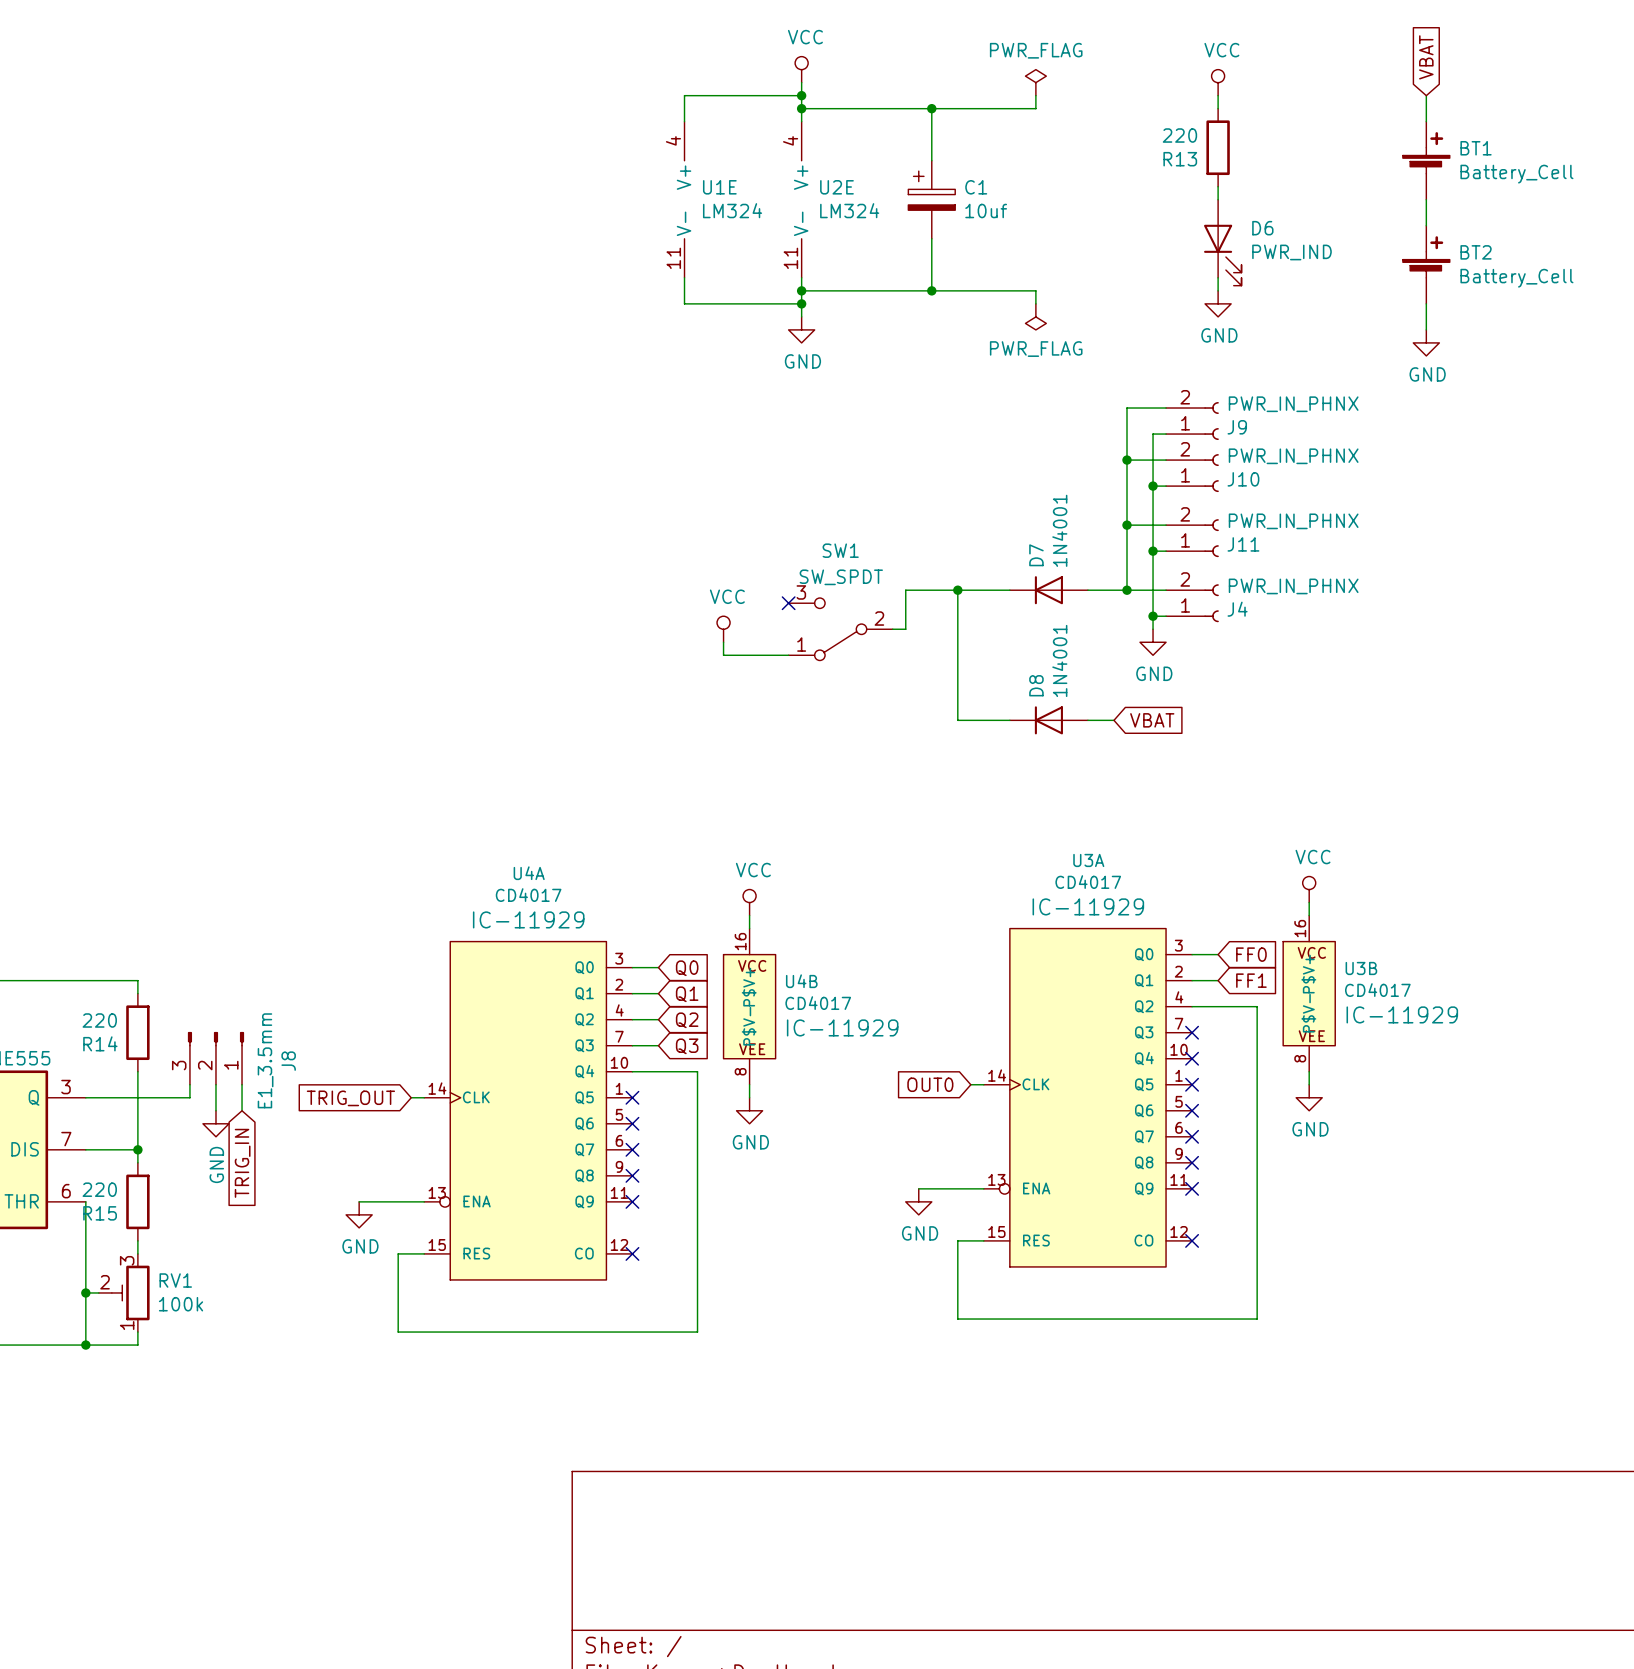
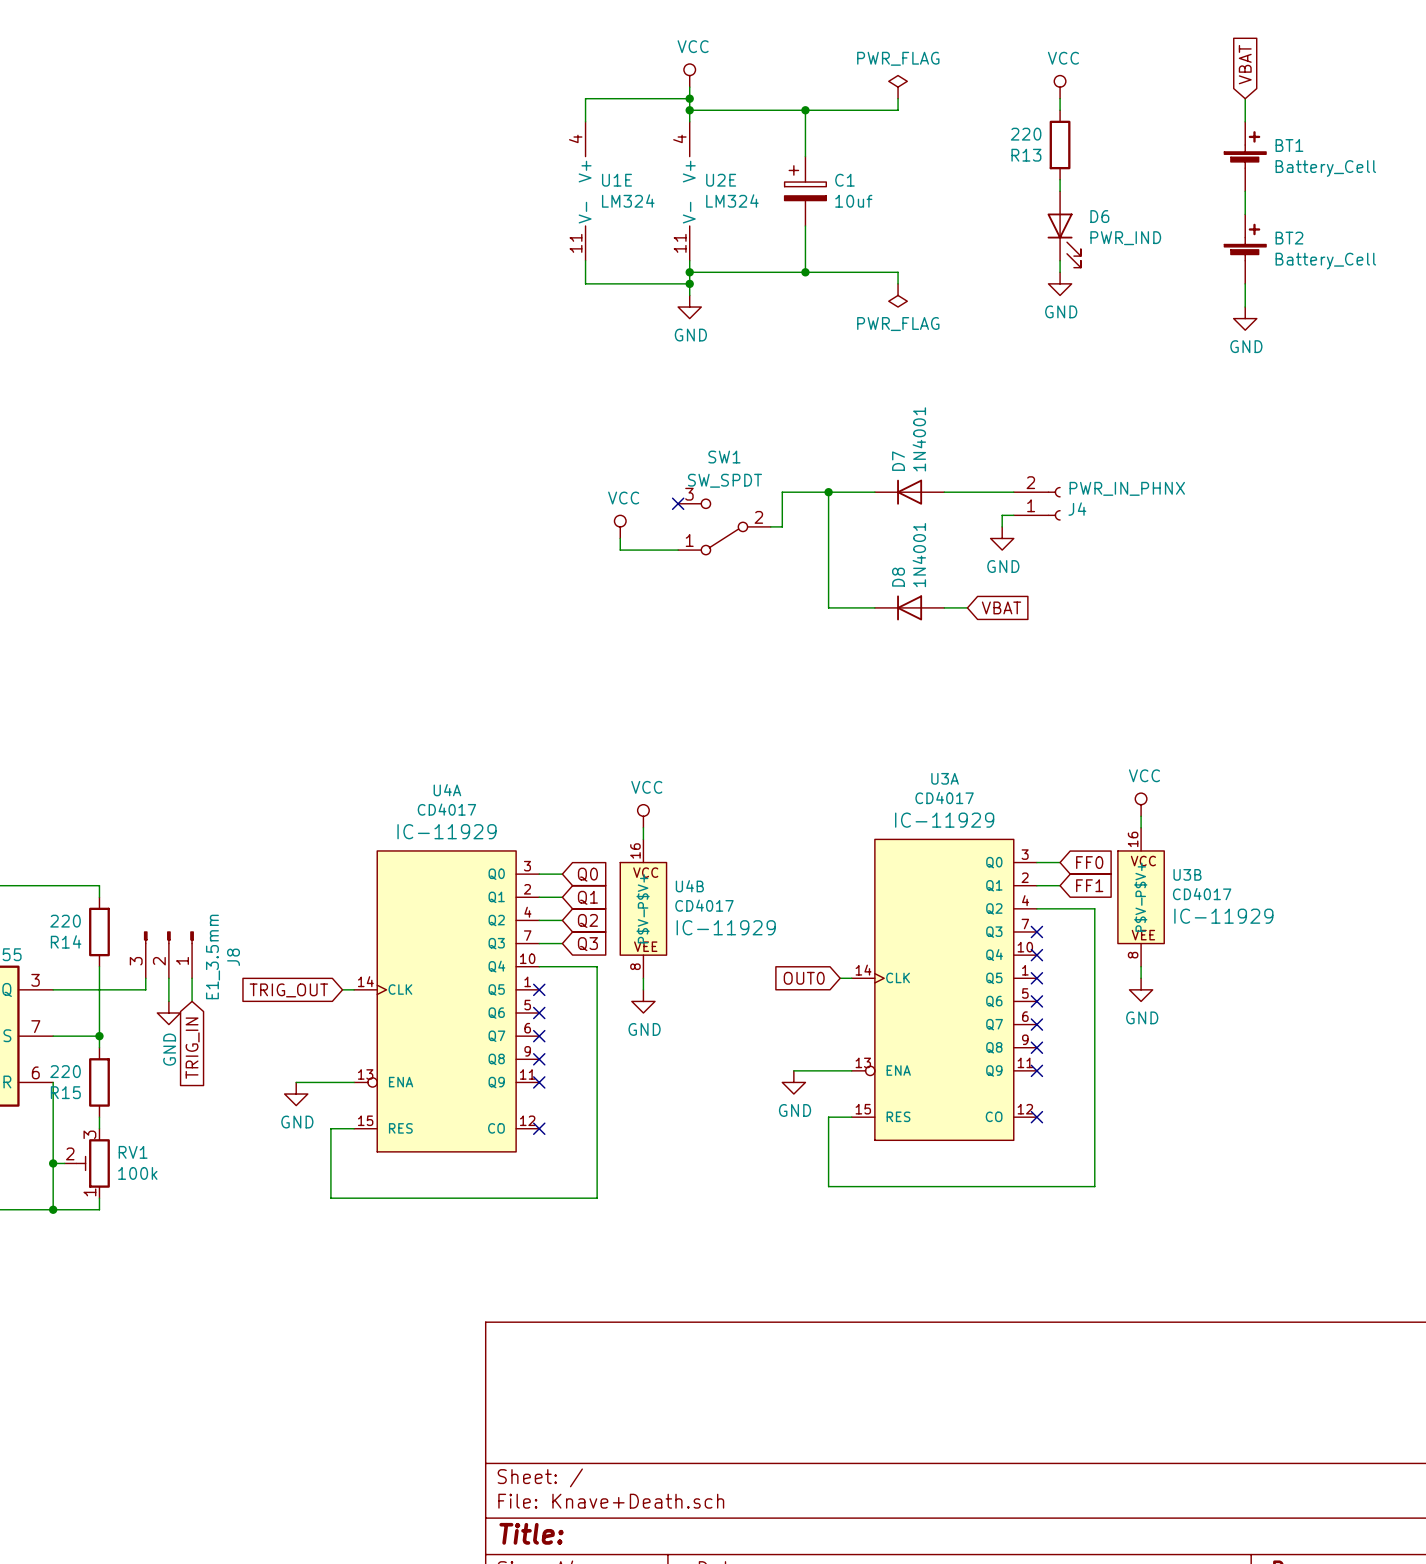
wire: (1166, 408) (1127, 408) (1127, 590) -> none
J9: PWR_IN_PHNX (1192, 421) -> none
wire: (1166, 434) (1153, 434) (1153, 564) -> (1013, 515) (1002, 515)
wire: (1127, 460) (1166, 460) -> none
junction: (1127, 460) -> none
J10: PWR_IN_PHNX (1192, 473) -> none
wire: (1153, 486) (1166, 486) -> none
junction: (1153, 486) -> none
wire: (1127, 525) (1166, 525) -> none
junction: (1127, 525) -> none
J11: PWR_IN_PHNX (1192, 538) -> none
wire: (1153, 551) (1166, 551) -> none
junction: (1153, 551) -> none
wire: (1153, 577) (1153, 629) -> (828, 492) (828, 538)
junction position: (957, 590) -> (828, 492)
wire: (1009, 590) (905, 590) (905, 629) (892, 629) -> (874, 492) (782, 492) (782, 526) (770, 526)
D7 position: (1048, 590) -> (909, 492)
wire: (1087, 590) (1166, 590) -> (944, 492) (1013, 492)
junction: (1127, 590) -> none
no-connect mark position: (788, 603) -> (678, 503)
J4 position: (1192, 603) -> (1037, 503)
wire: (1153, 616) (1166, 616) -> none
junction: (1153, 616) -> none
power symbol position: VCC (723, 629) -> VCC (620, 526)
SW1 position: (840, 629) -> (724, 526)
wire: (723, 642) (723, 655) (788, 655) -> (620, 538) (620, 550) (678, 550)
power symbol position: GND (1153, 642) -> GND (1002, 538)
wire: (957, 668) (957, 720) (1009, 720) -> (828, 607) (874, 607)
D8 position: (1048, 720) -> (909, 607)
wire: (1087, 720) (1113, 720) -> (944, 607) (967, 607)
global label position: VBAT (1152, 720) -> VBAT (1001, 607)

